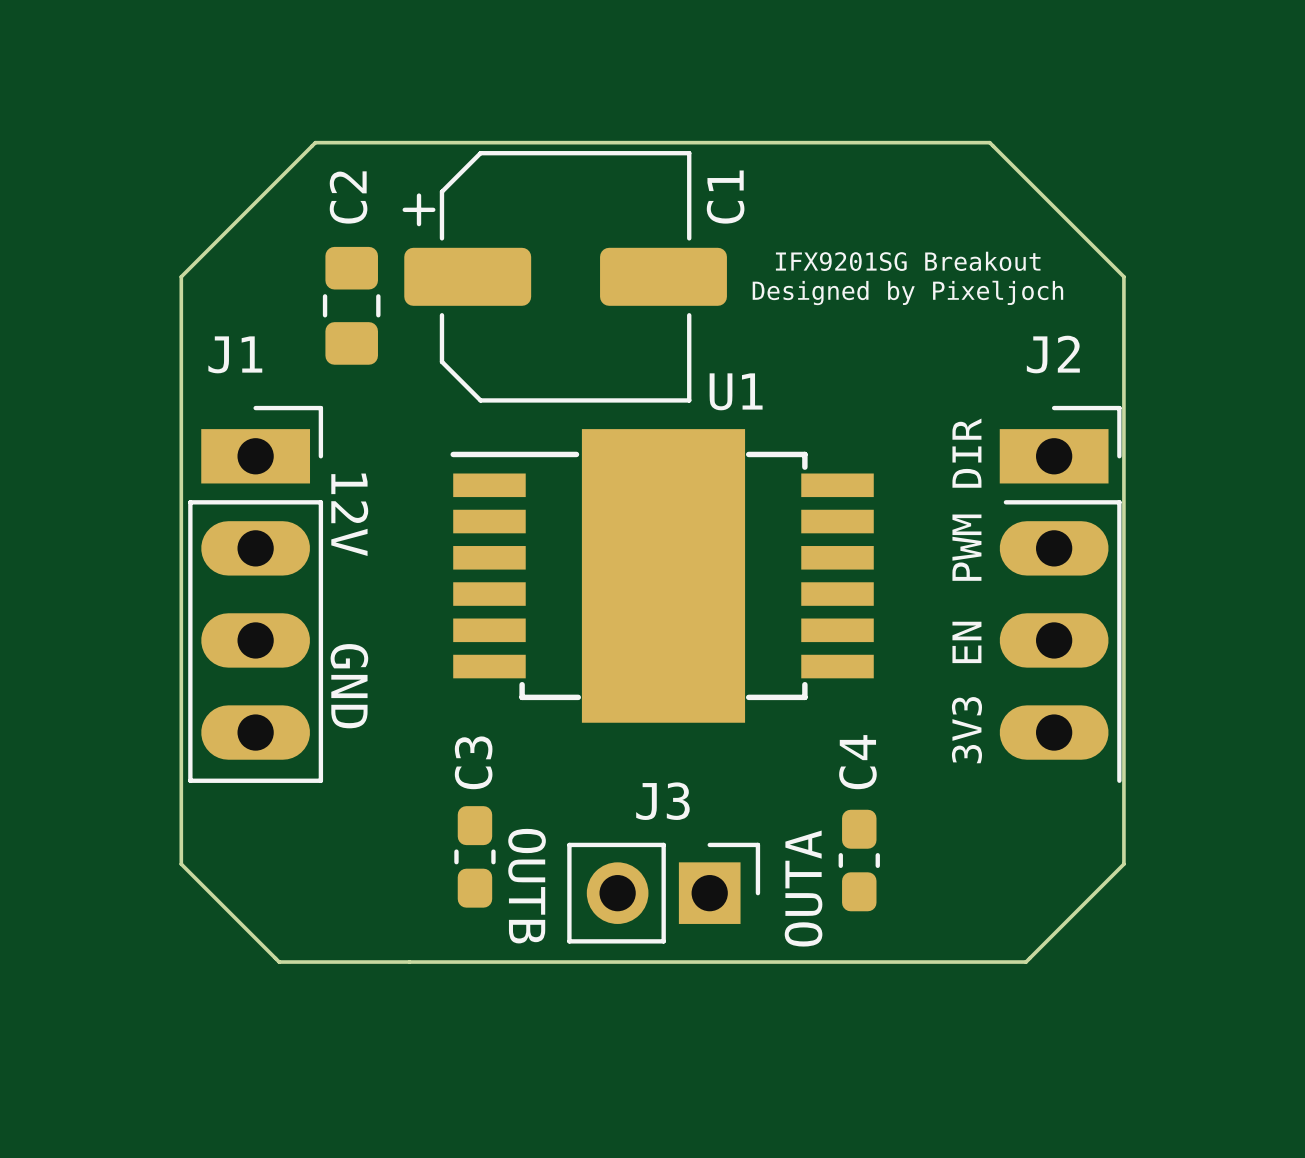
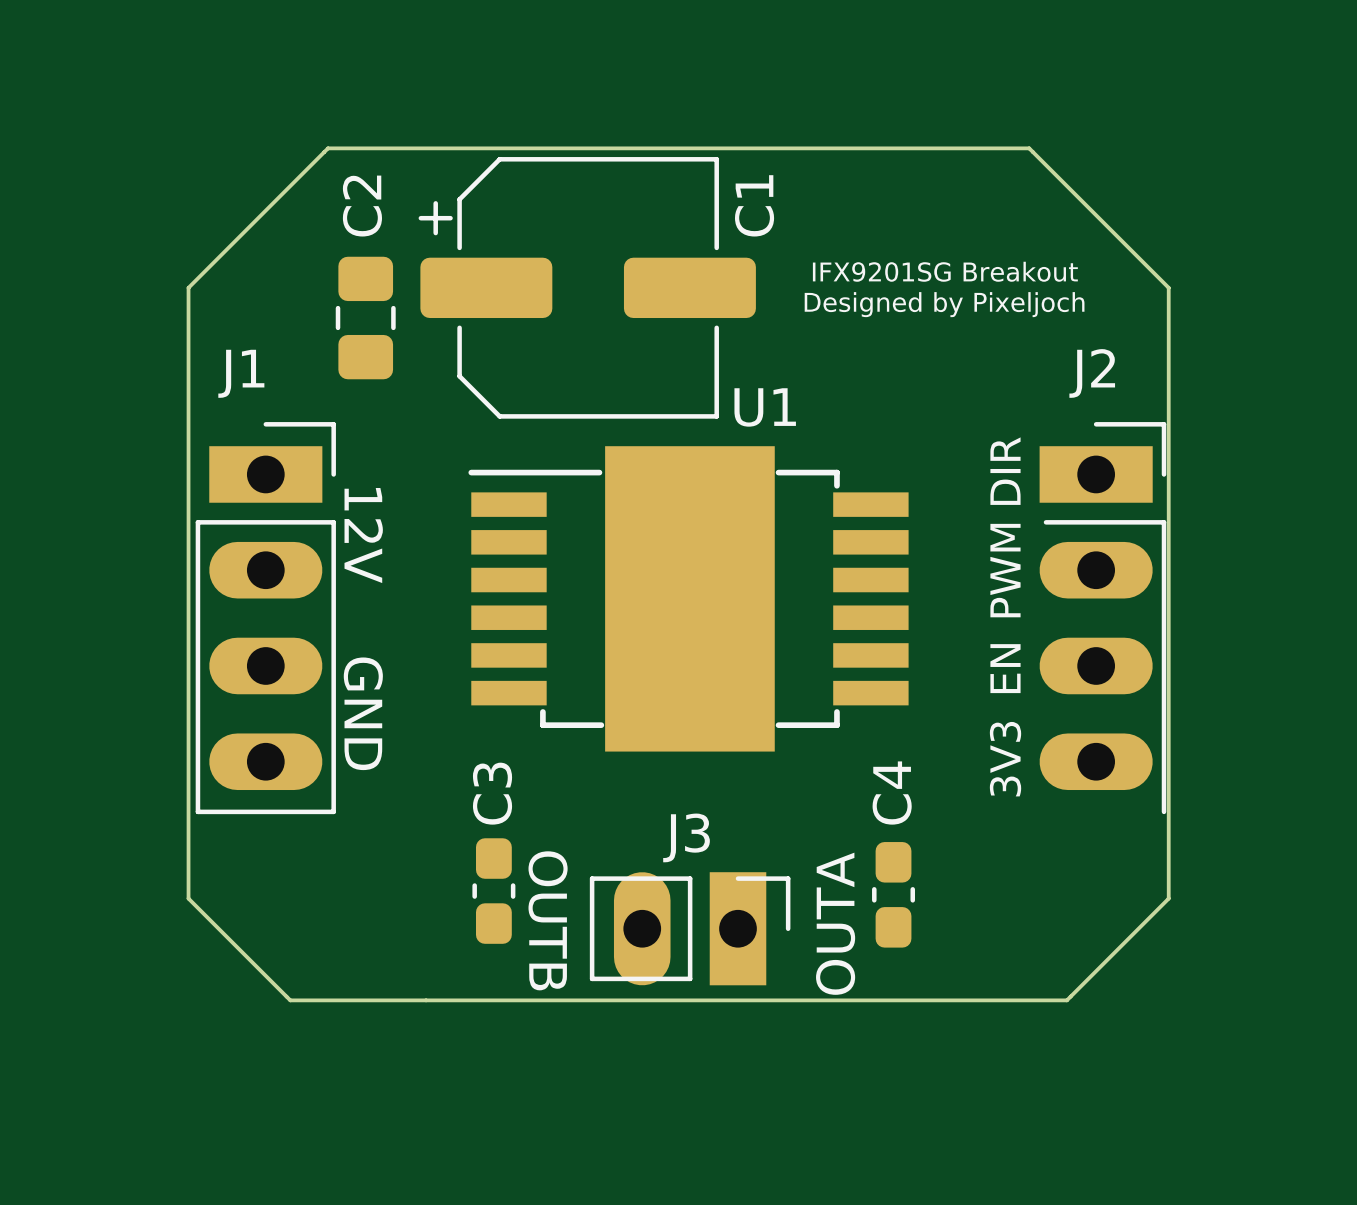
J3 footprint: [567, 842, 761, 944] -> [589, 872, 791, 986]

